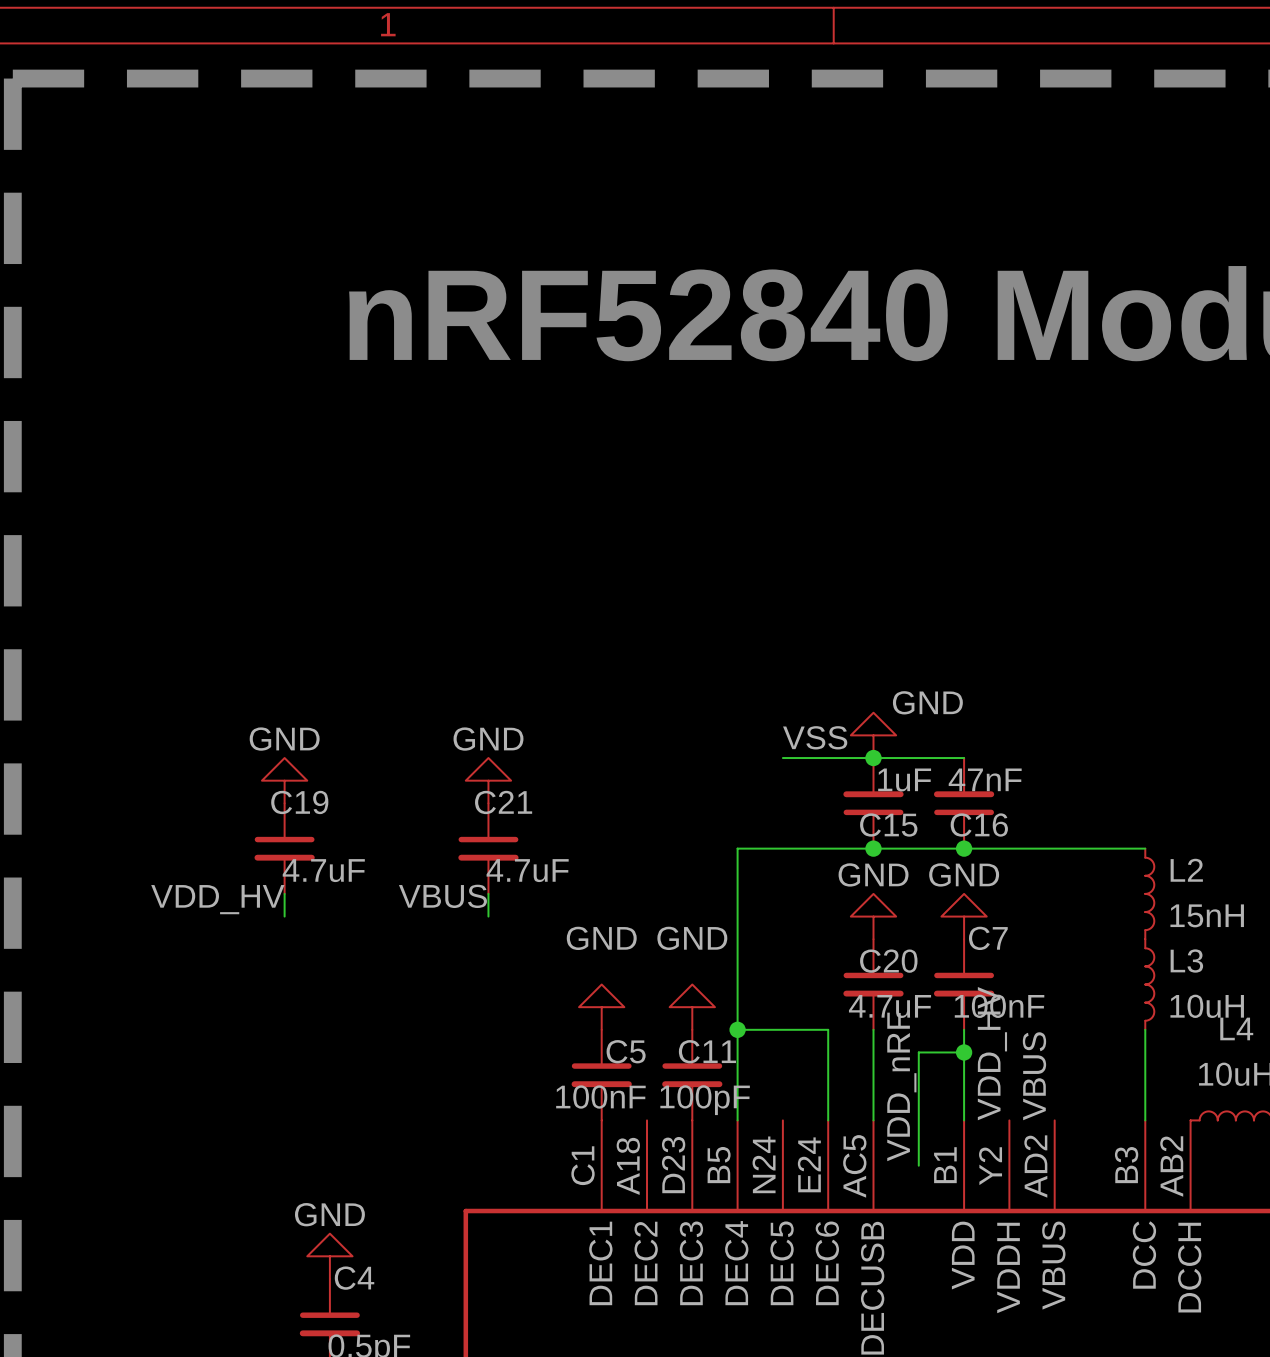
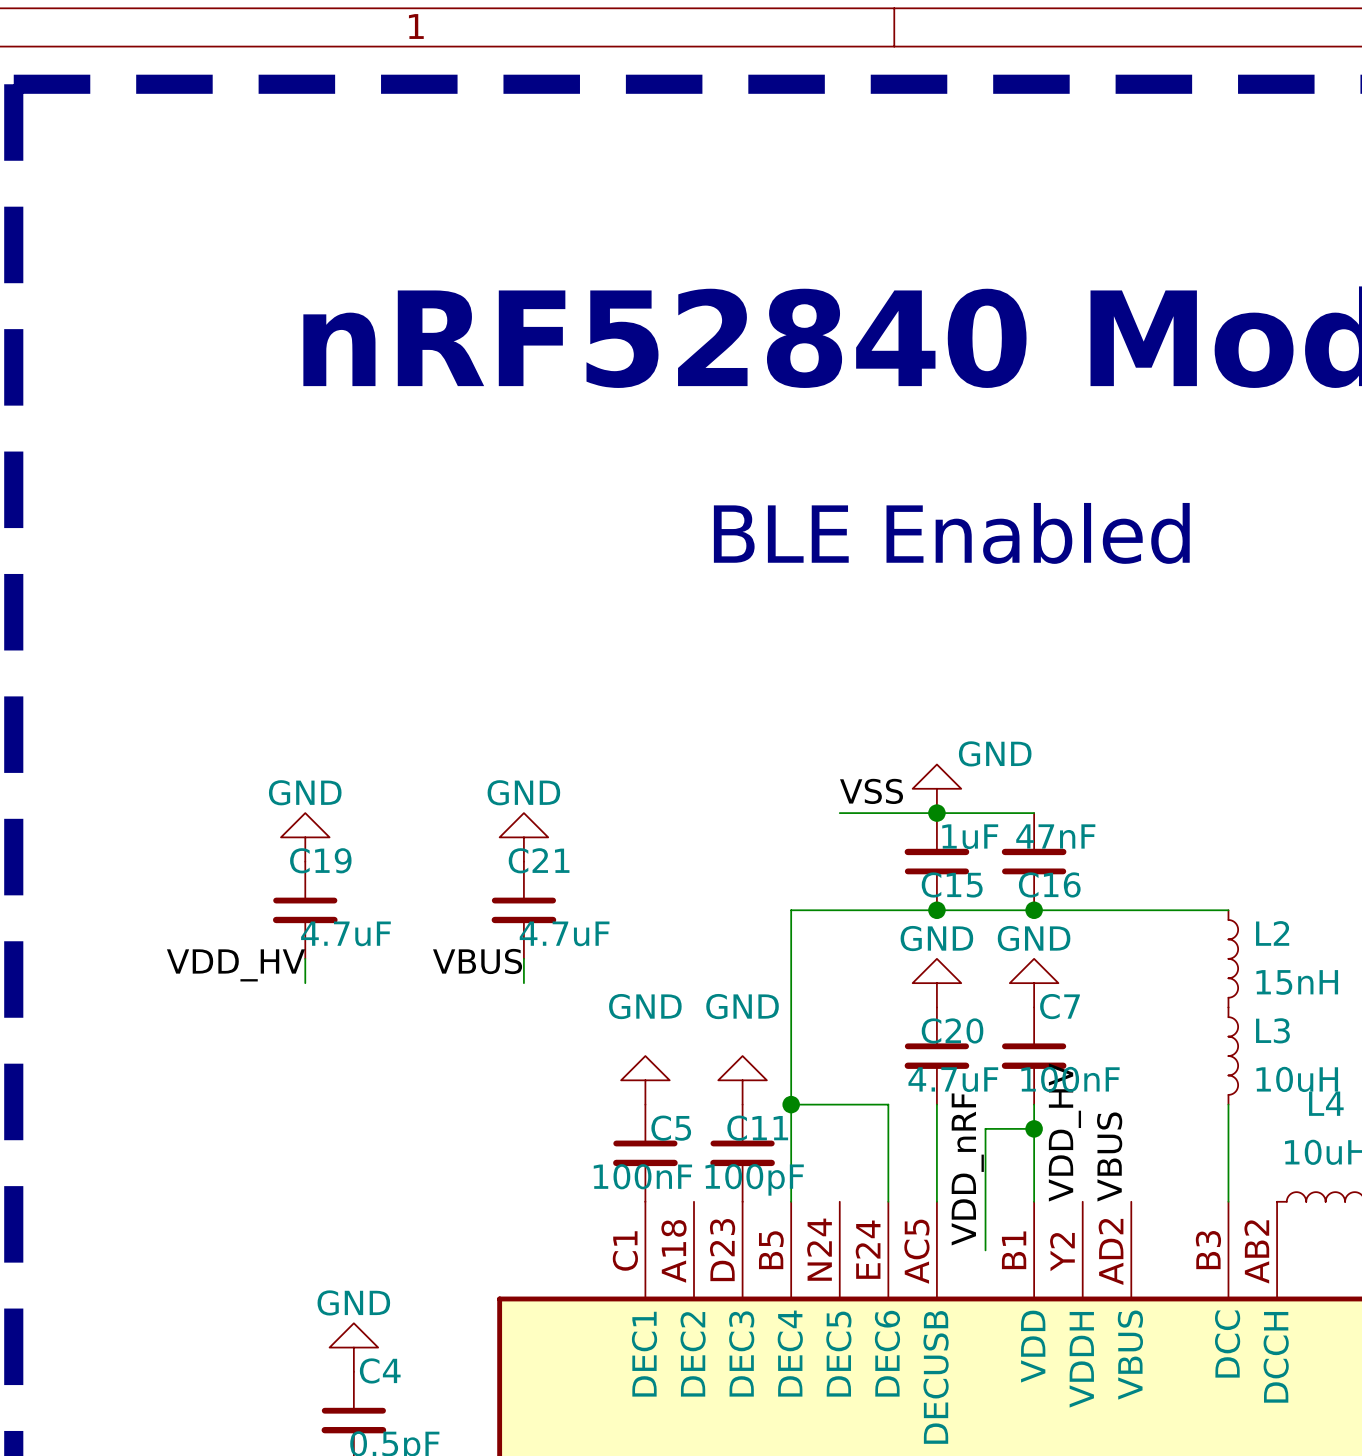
text: none -> BLE Enabled (951, 533)

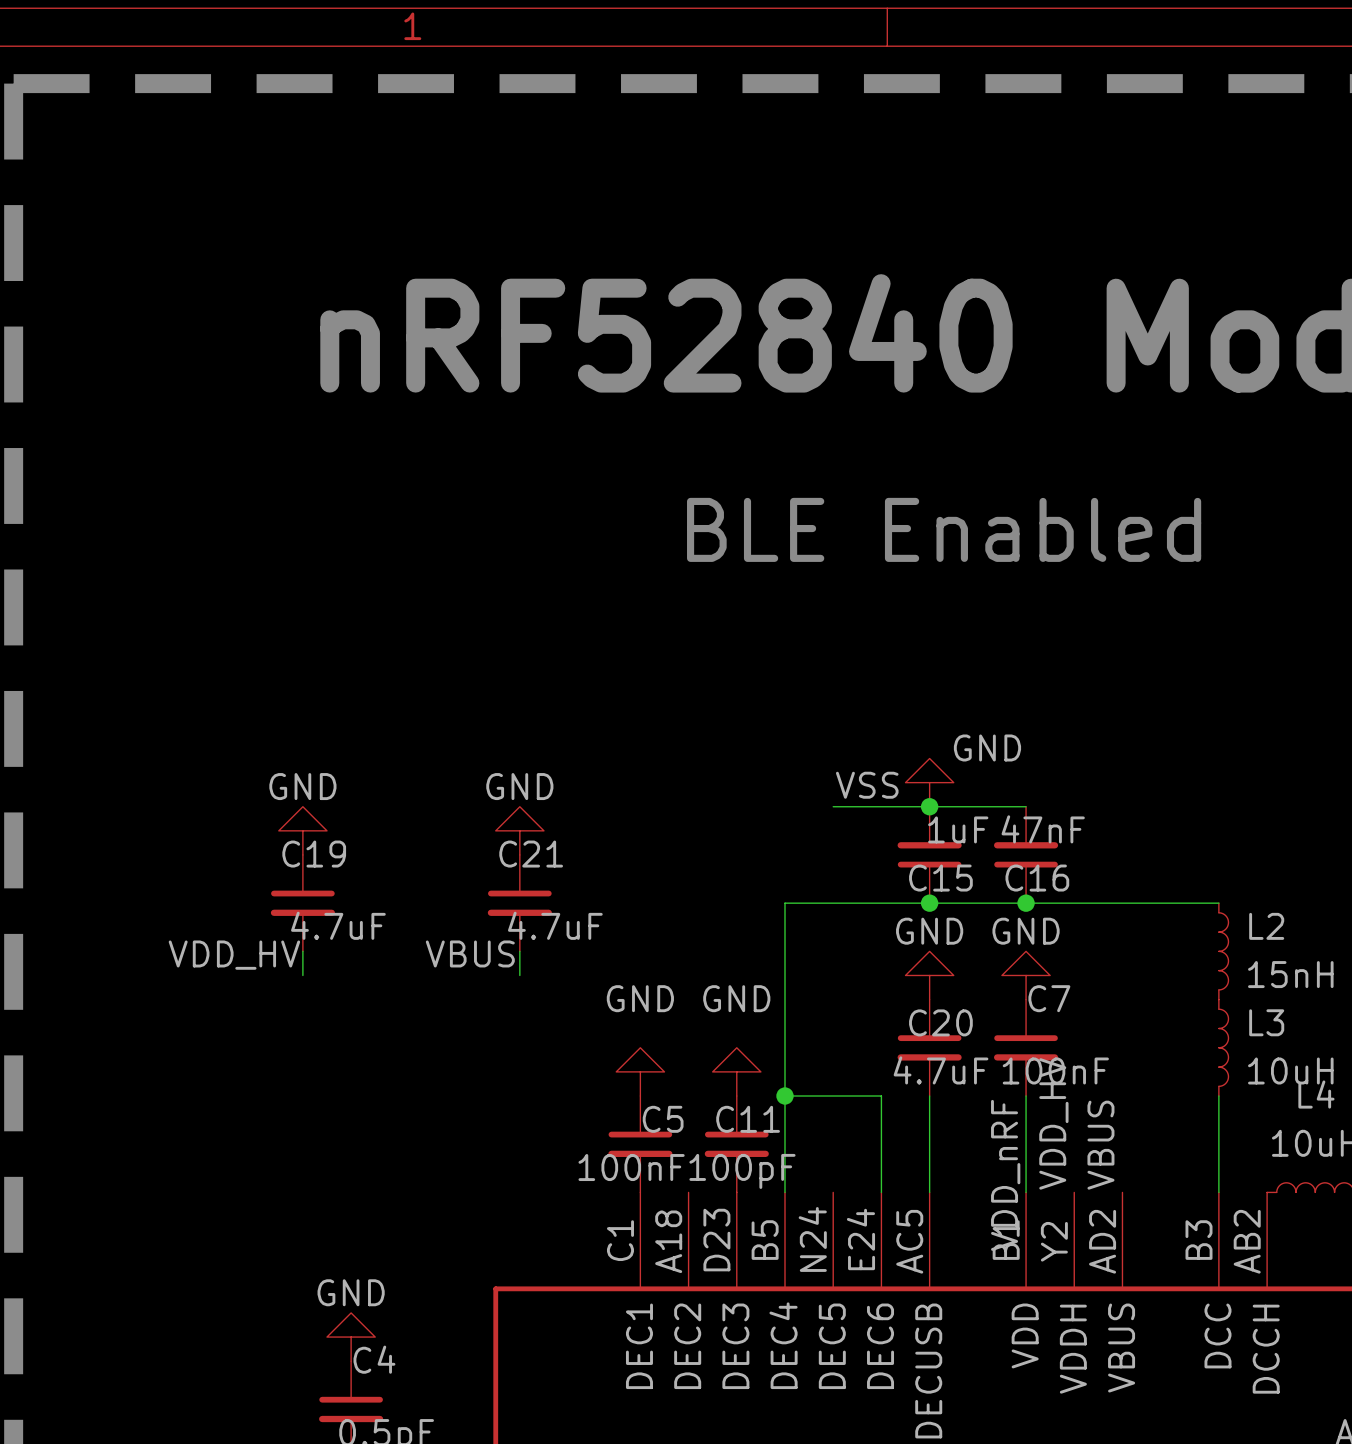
wire: (1034, 1128) (985, 1128) (985, 1250) -> none
junction: (1034, 1128) -> none
label position: VDD_nRF (967, 1169) -> VDD_nRF (1005, 1175)

